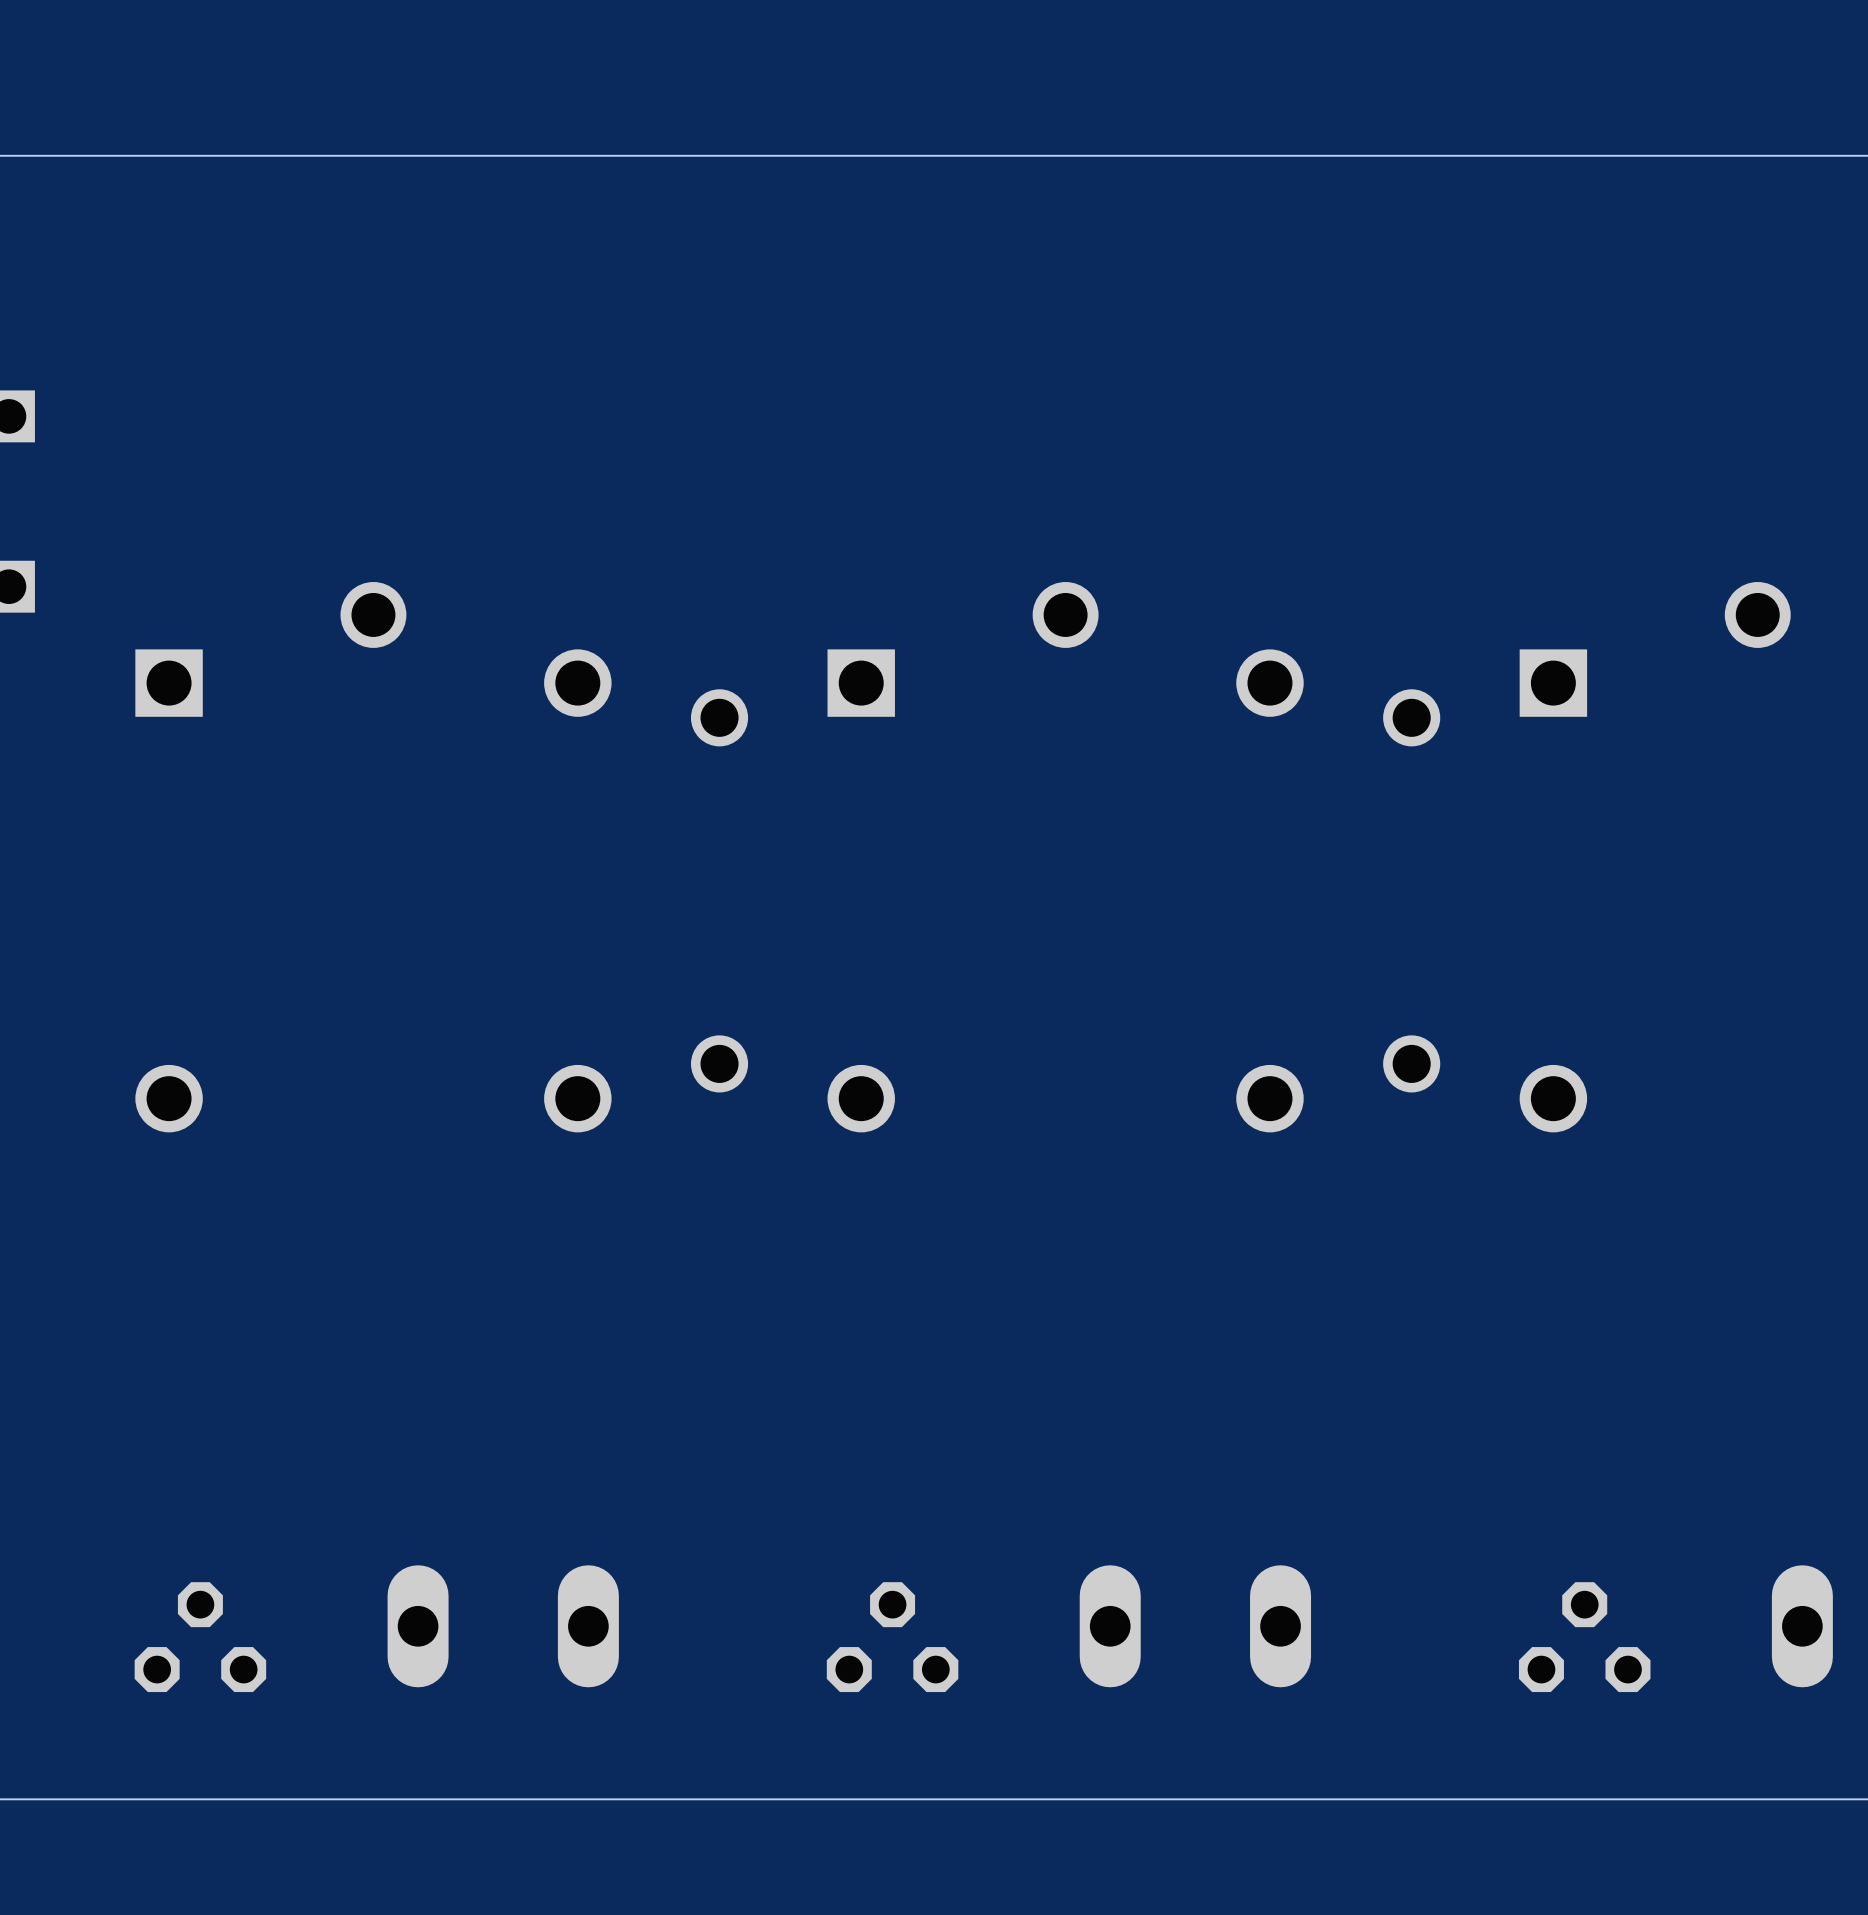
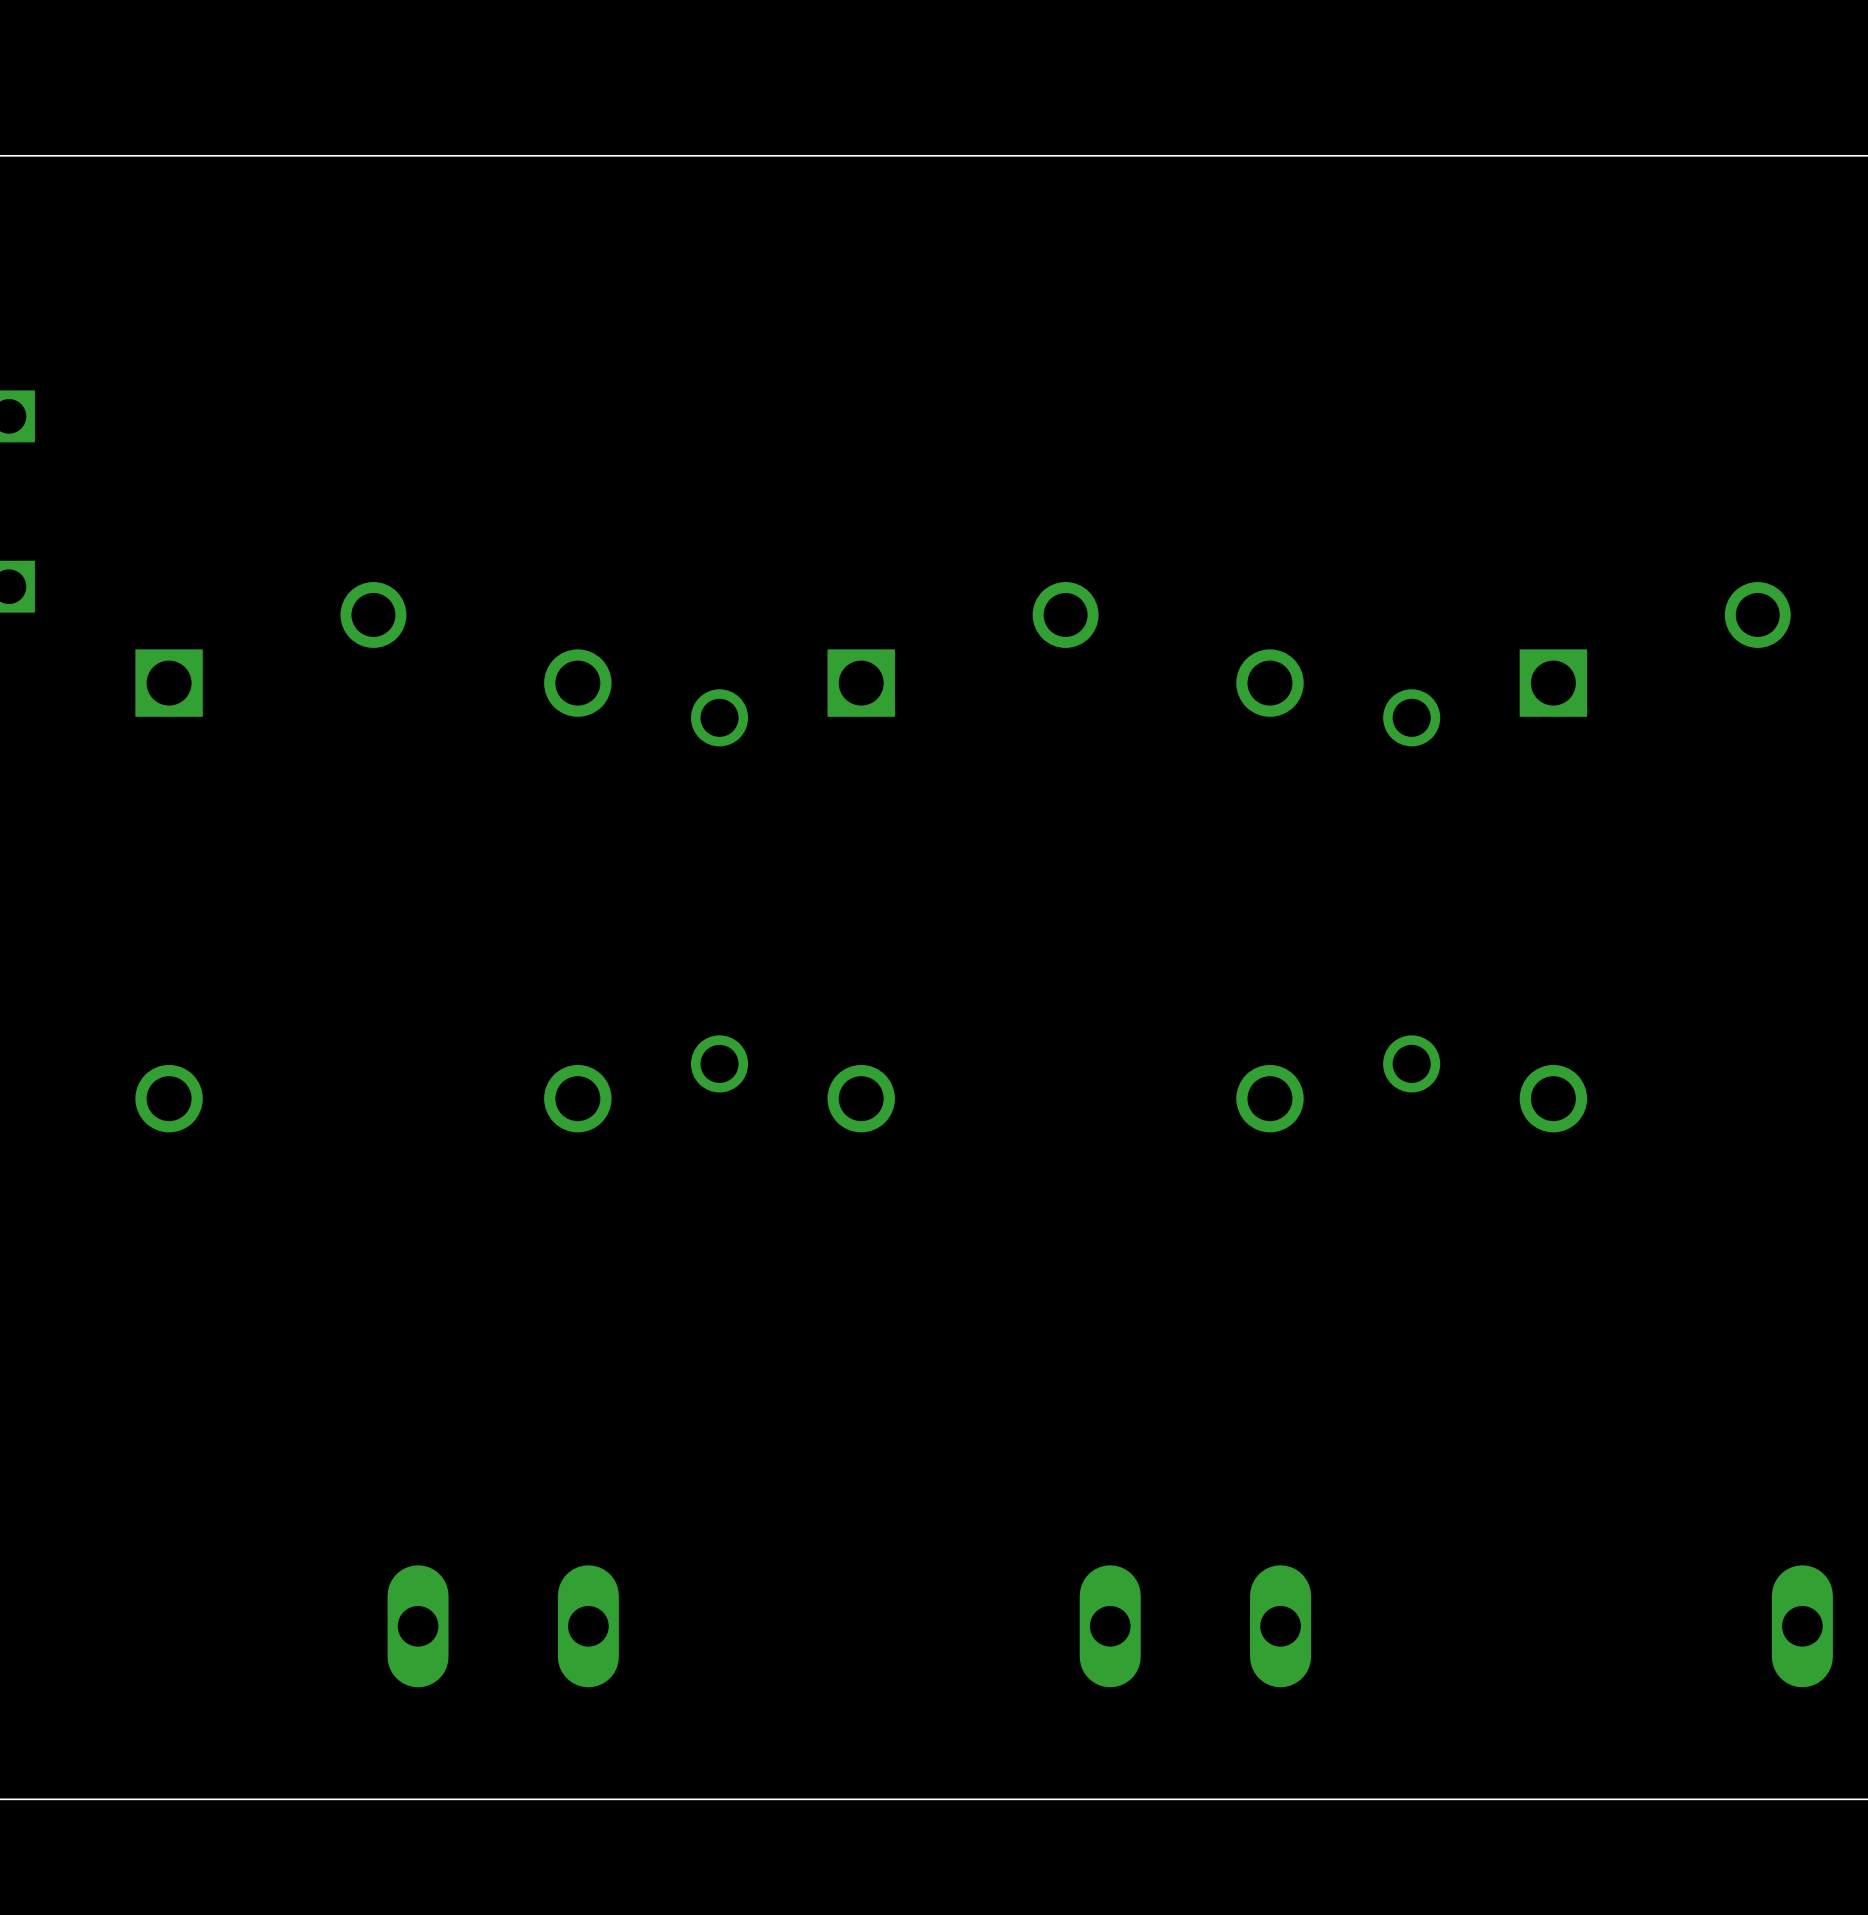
part: (200, 1637) -> none
part: (892, 1637) -> none
part: (1584, 1637) -> none

